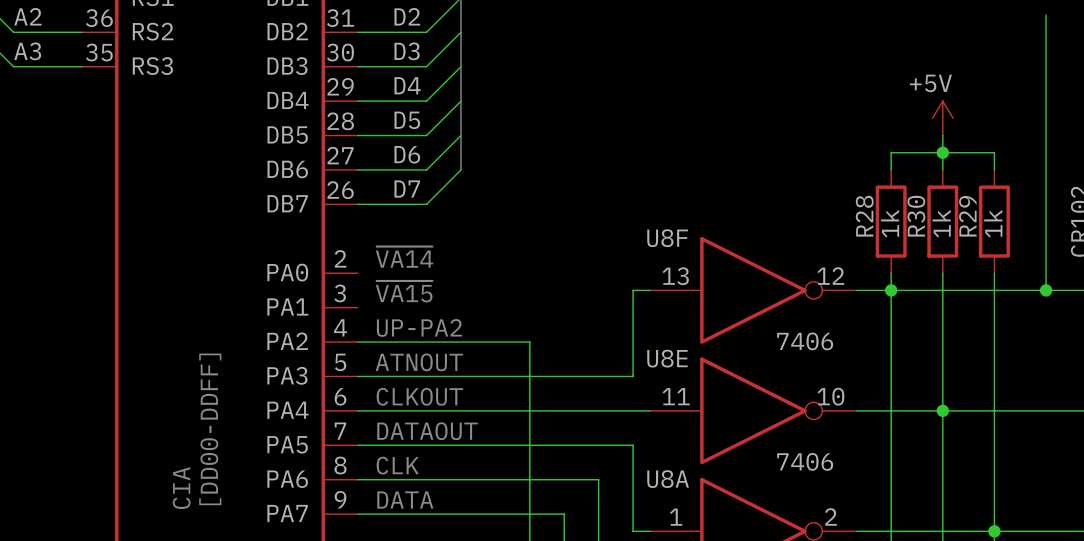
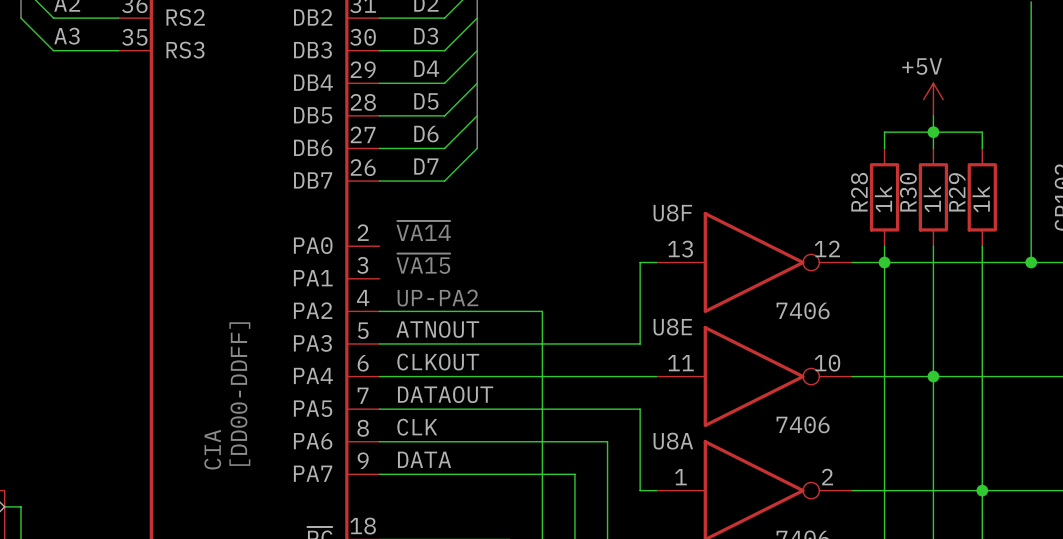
label: none -> ATNOUT (437, 329)
text: ATNOUT (419, 362) -> none
label: none -> CLKOUT (438, 362)
text: CLKOUT (419, 396) -> none
label: none -> DATAOUT (445, 394)
text: DATAOUT (427, 431) -> none
label: none -> CLK (417, 427)
text: CLK (397, 465) -> none
label: none -> DATA (424, 459)
text: DATA (405, 500) -> none

